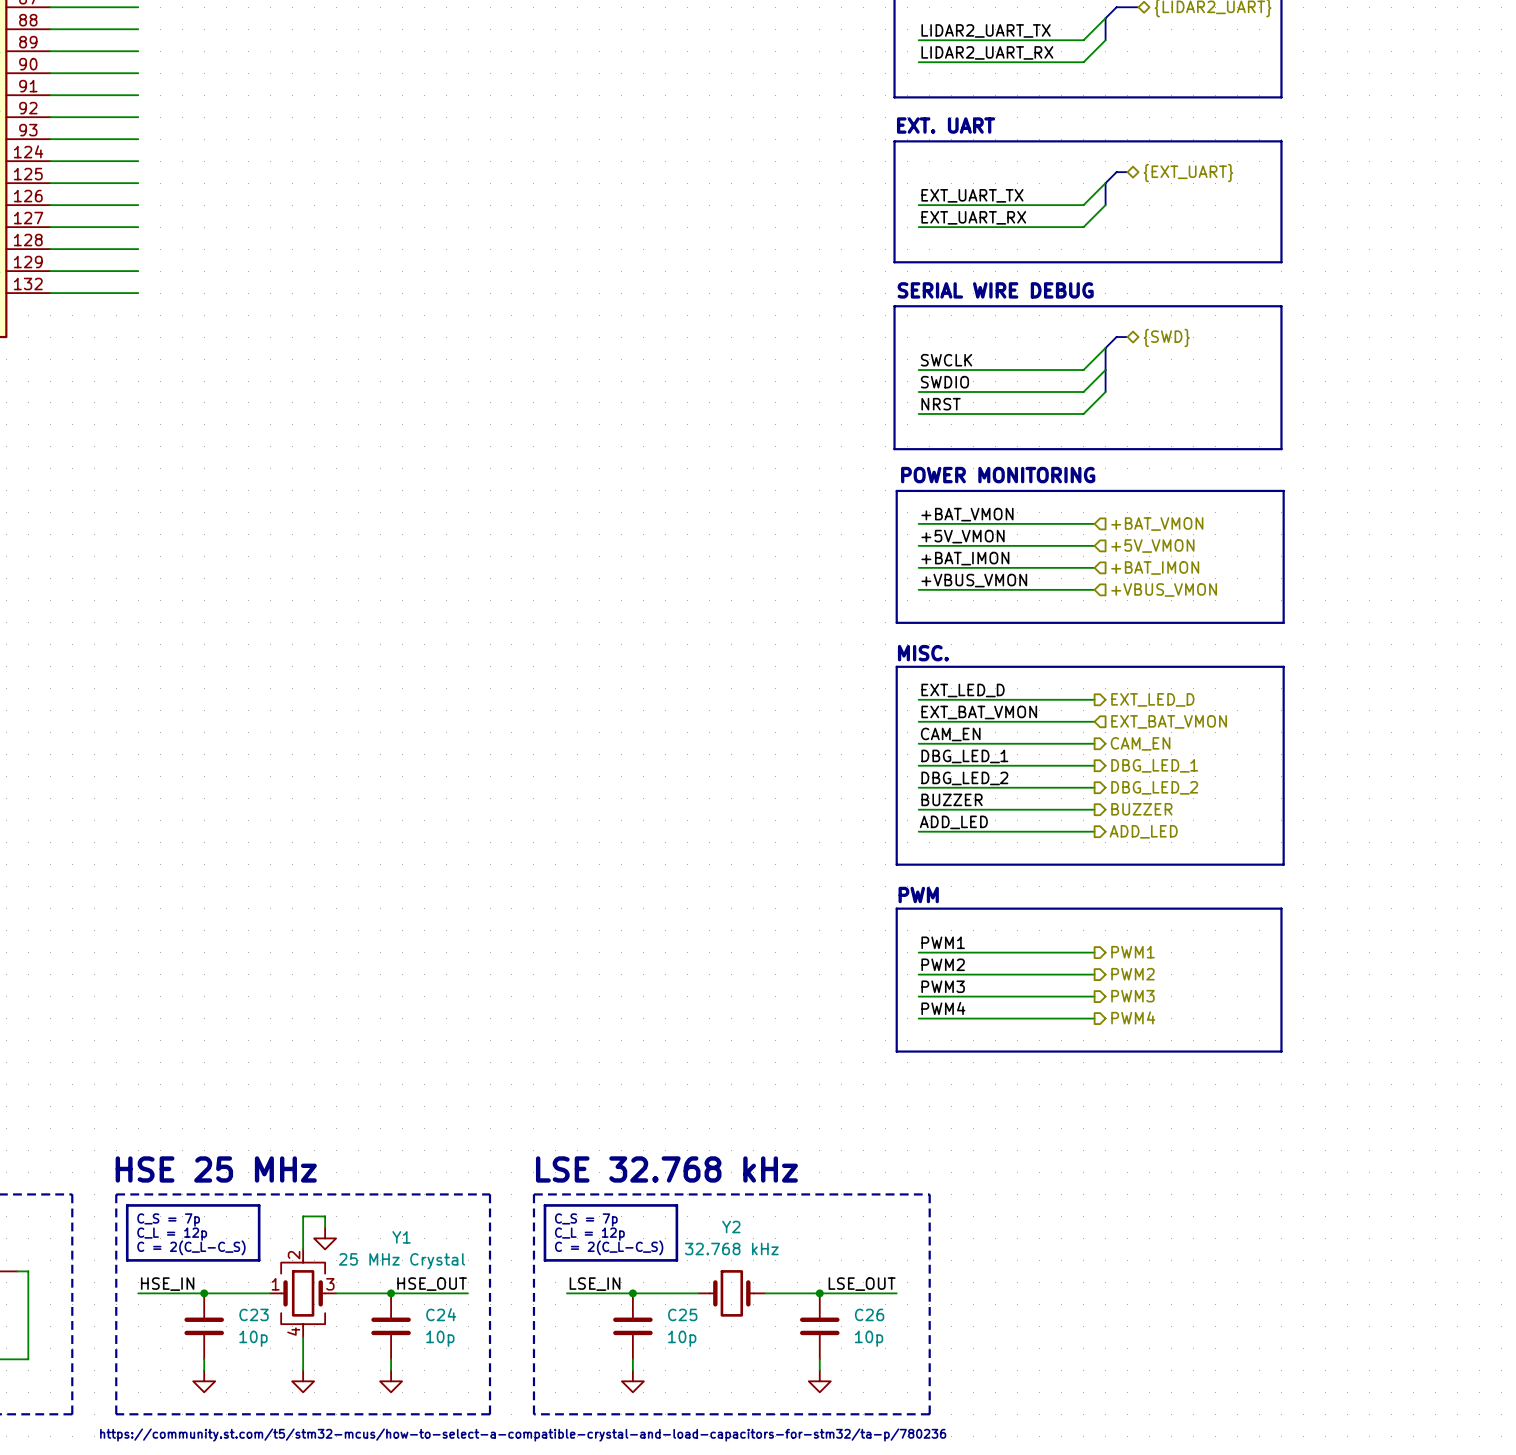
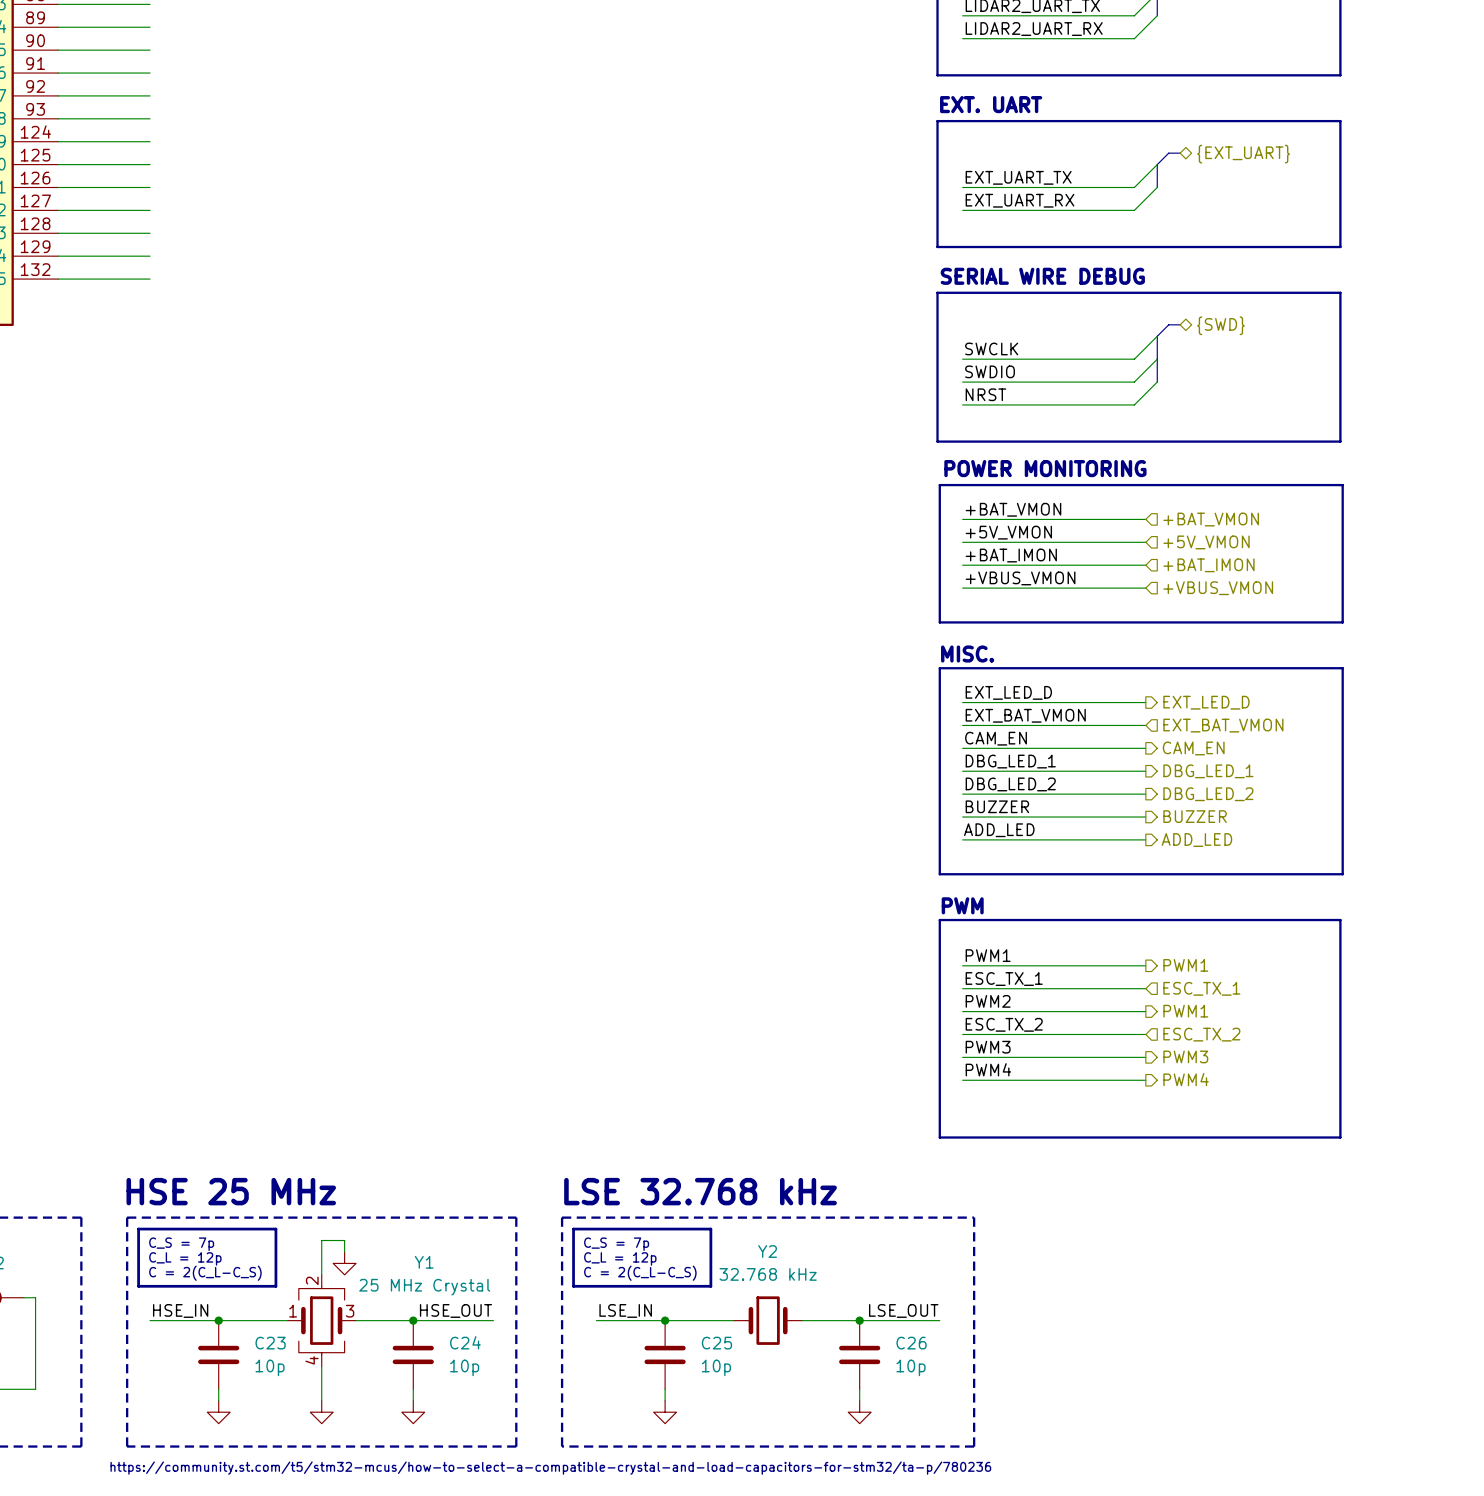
label: PWM2 (943, 964) -> ESC_TX_1 (1004, 979)
hierarchical label shape: output (1132, 974) -> input (1201, 988)
hierarchical label: PWM2 (1132, 974) -> ESC_TX_1 (1201, 988)
label: PWM3 (943, 986) -> PWM2 (988, 1001)
hierarchical label: PWM3 (1132, 996) -> PWM1 (1185, 1011)
label: PWM4 (943, 1008) -> ESC_TX_2 (1004, 1024)
hierarchical label shape: output (1133, 1017) -> input (1201, 1034)
hierarchical label: PWM4 (1133, 1017) -> ESC_TX_2 (1201, 1034)
label: none -> PWM3 (988, 1047)
wire: none -> (962, 1057) (1145, 1057)
hierarchical label: none -> PWM3 (1185, 1056)
line: (896, 1051) (1281, 1051) -> (939, 1068) (939, 1137) (1340, 1137) (1340, 1068)
label: none -> PWM4 (988, 1069)
hierarchical label: none -> PWM4 (1186, 1079)
wire: none -> (962, 1080) (1145, 1080)

